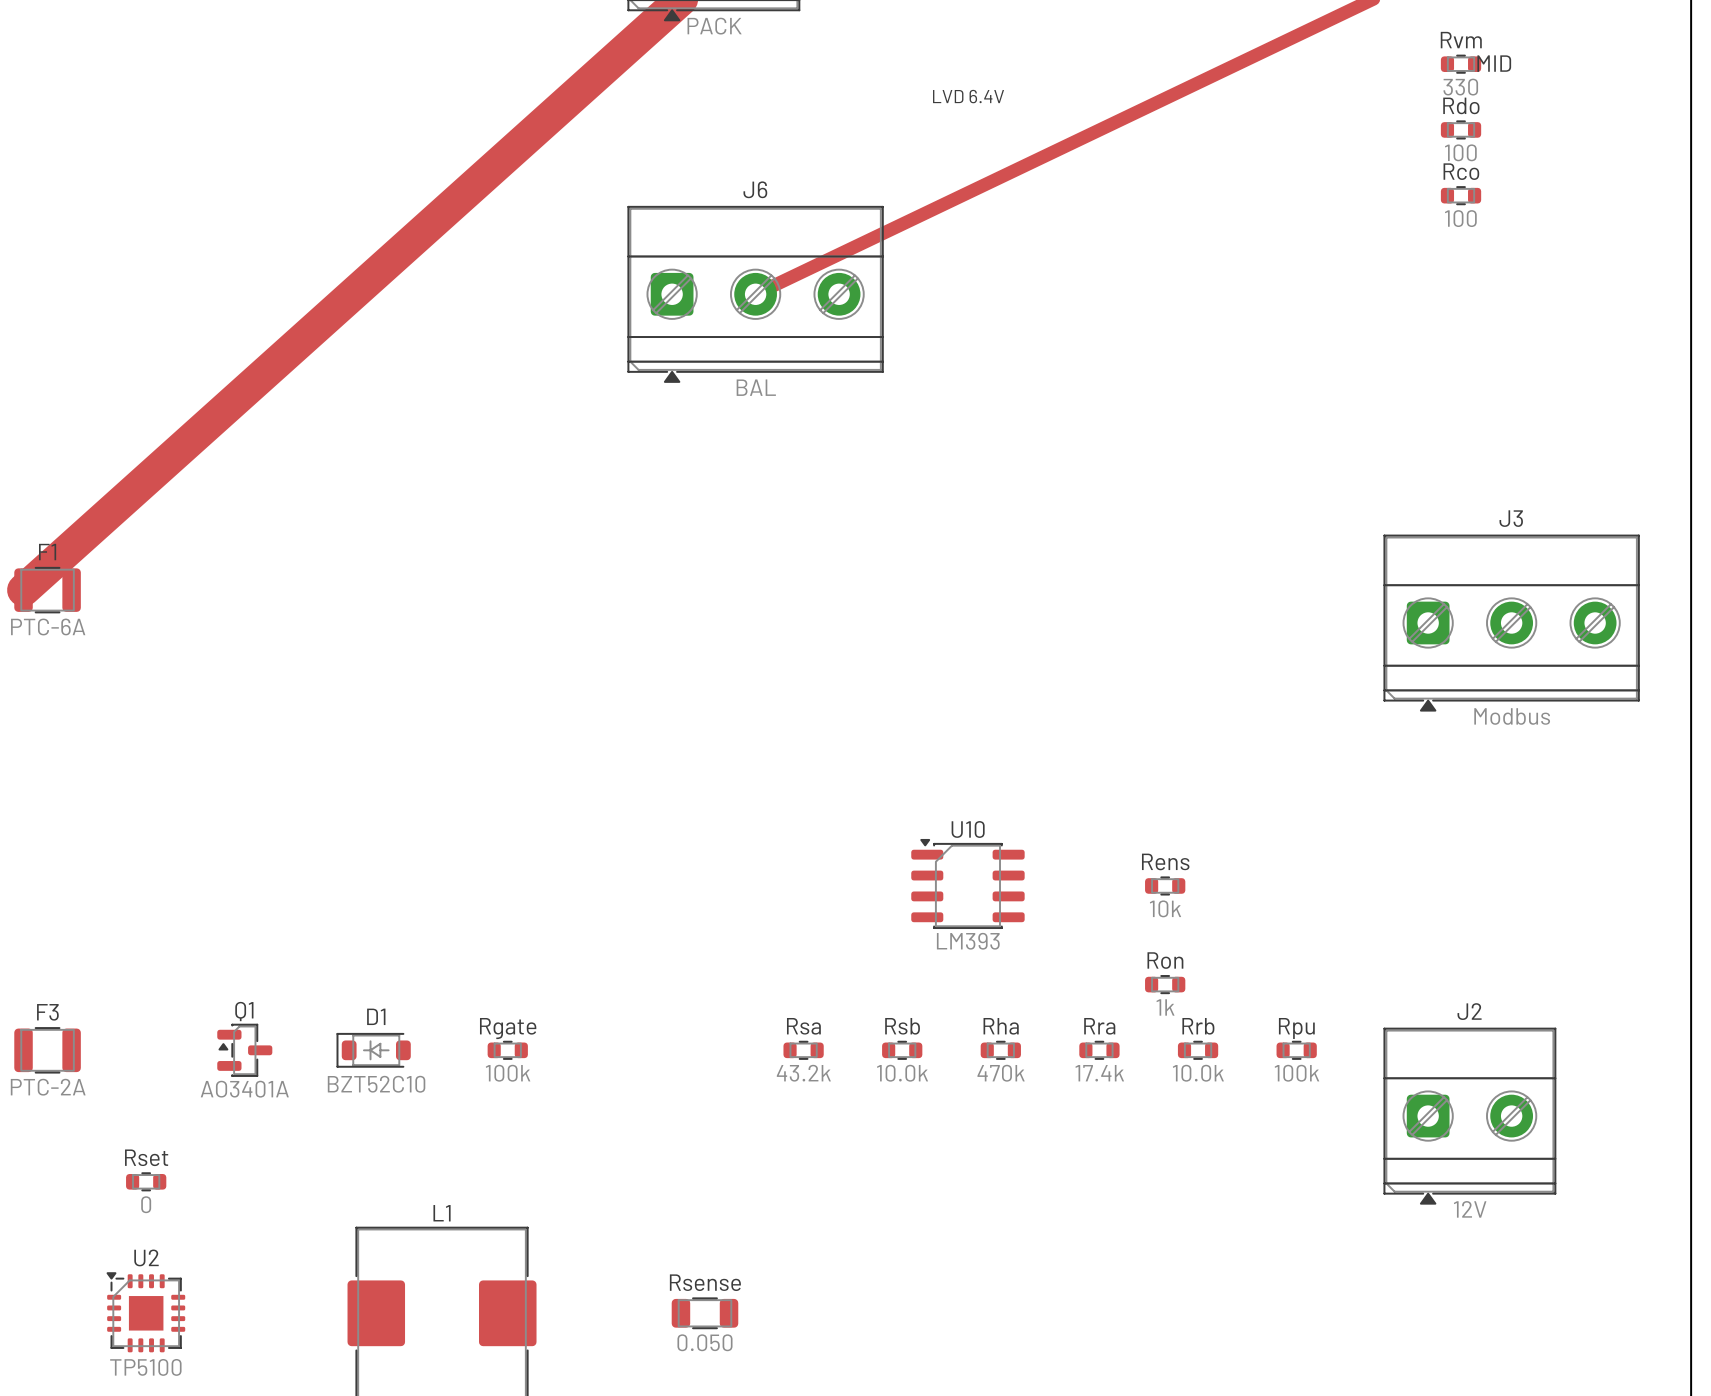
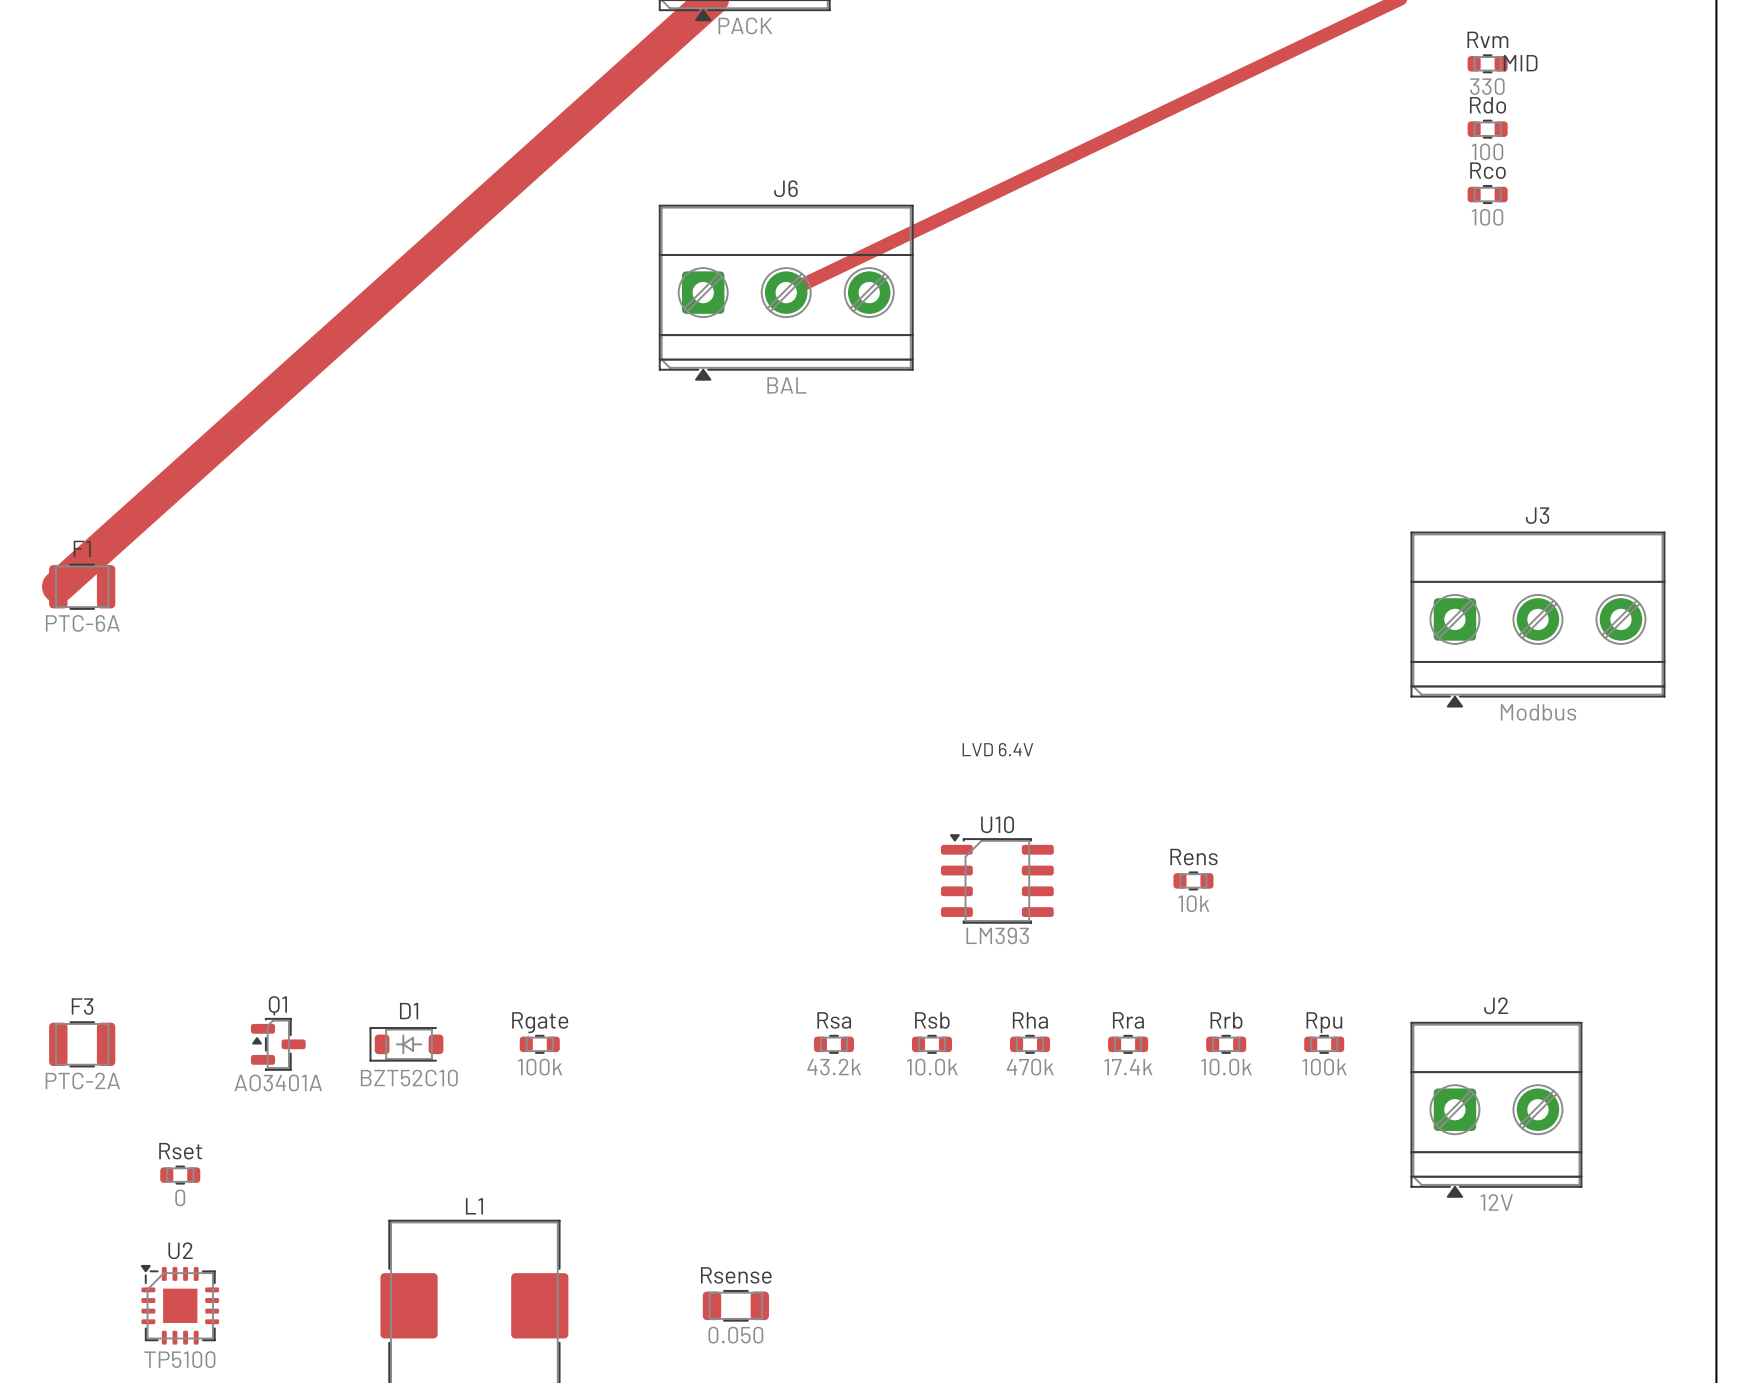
text: LVD 6.4V (968, 96) -> none
text: none -> LVD 6.4V (997, 749)
Ron: 1k (1165, 984) -> none

